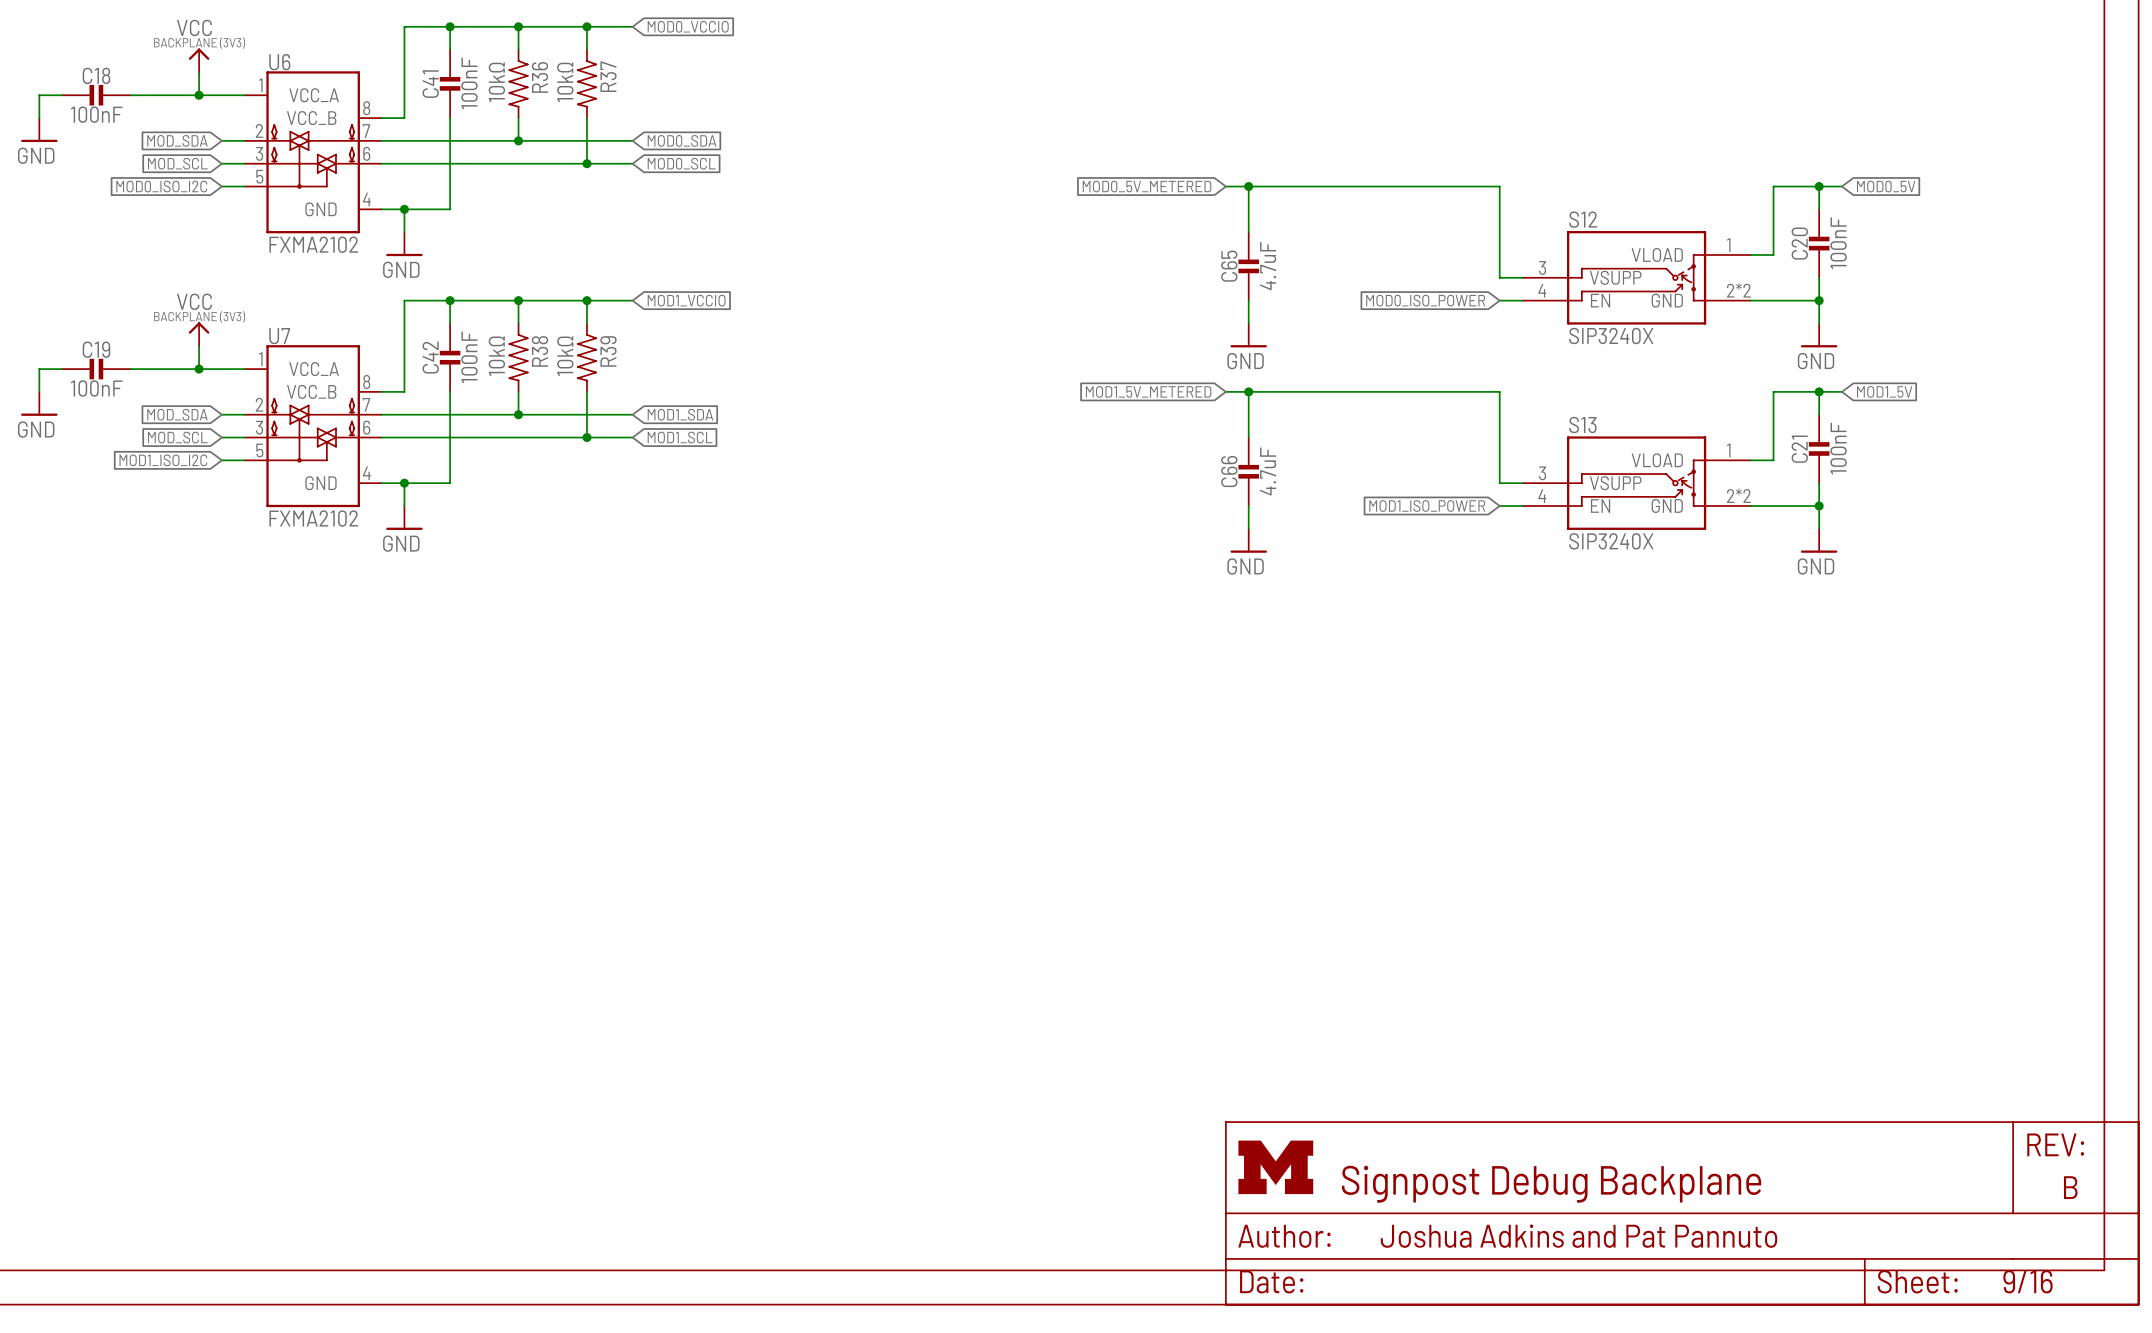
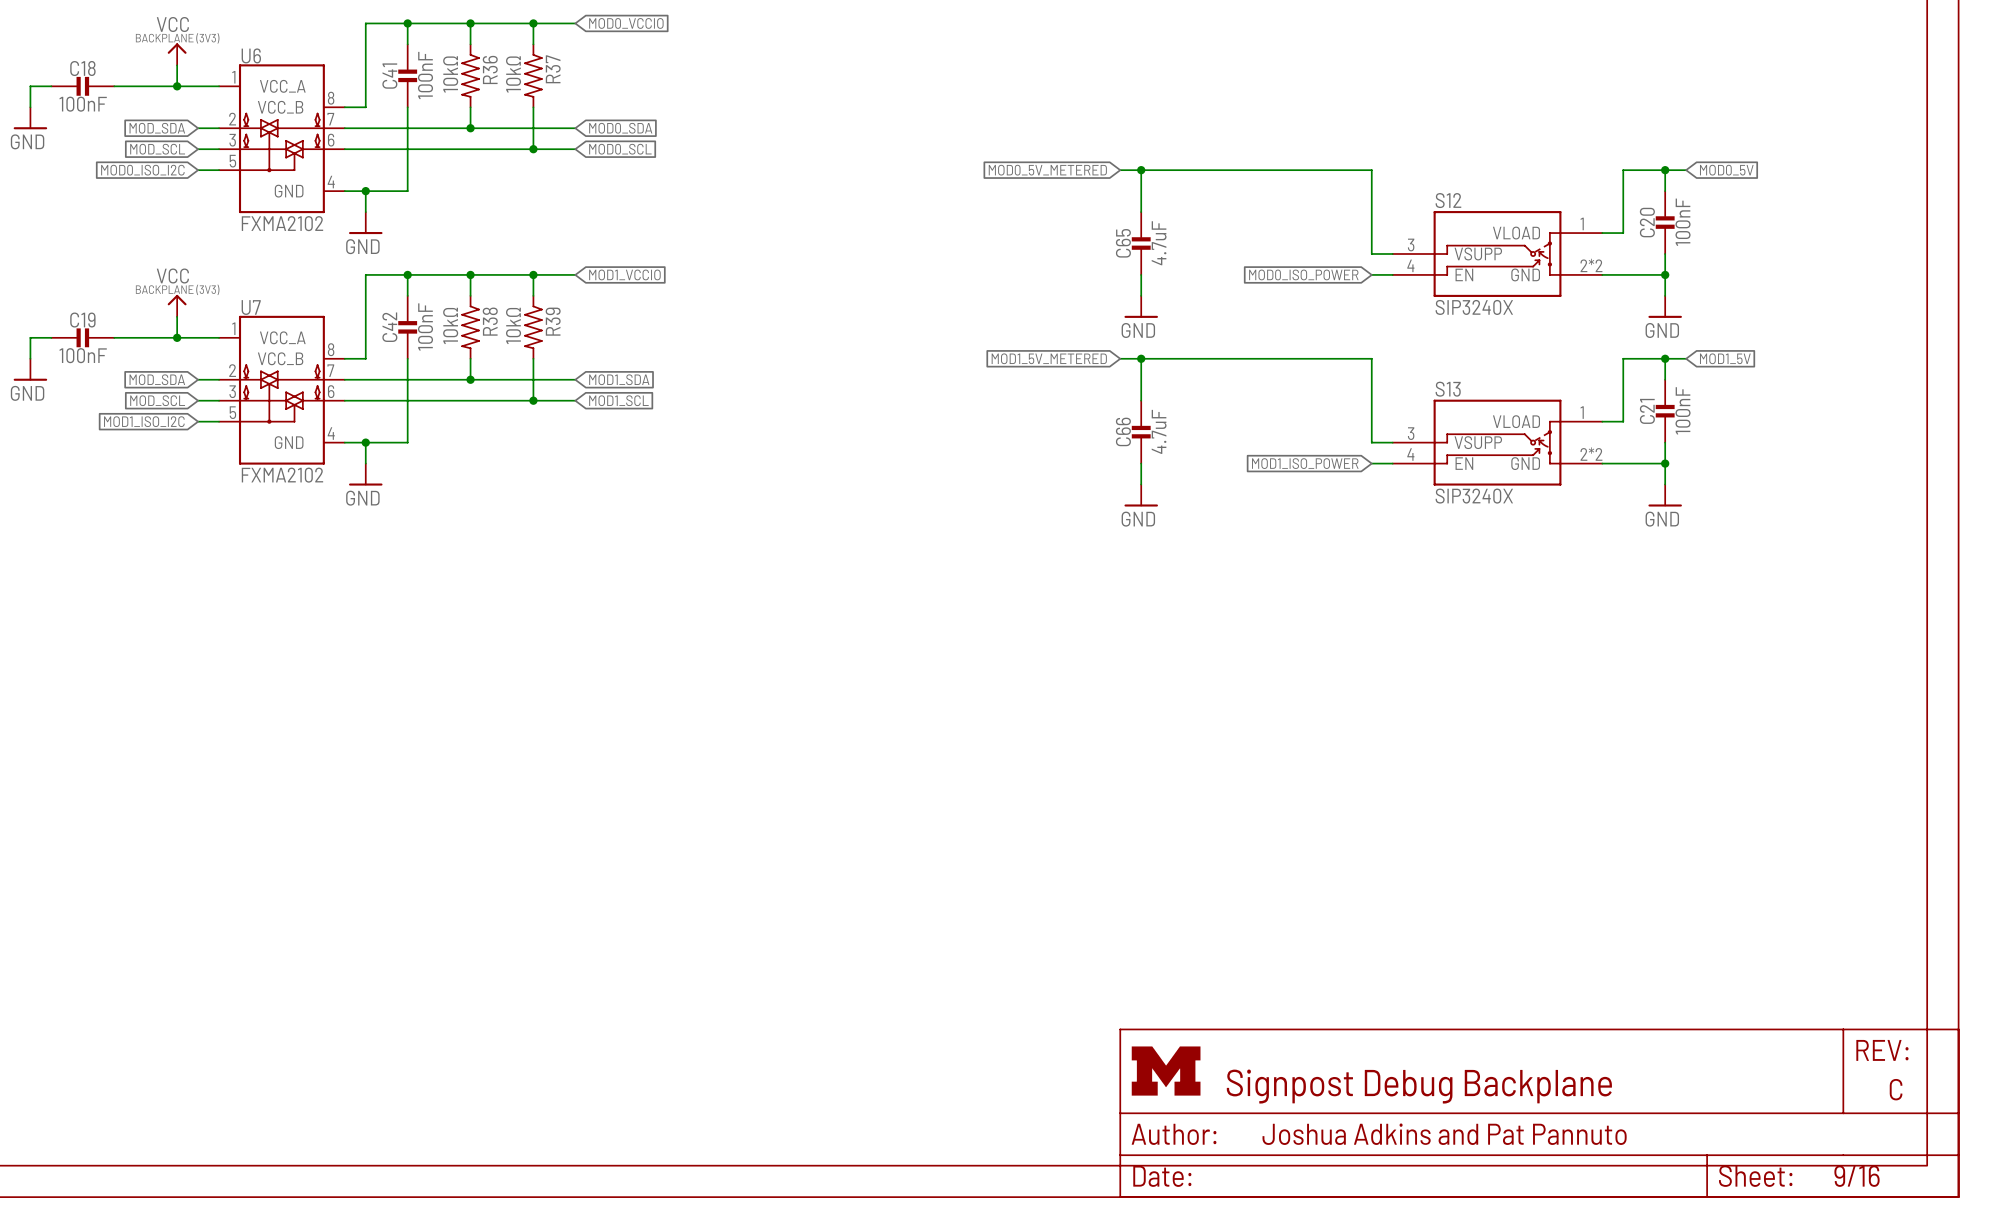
part text: B (2070, 1187) -> C (1896, 1089)

